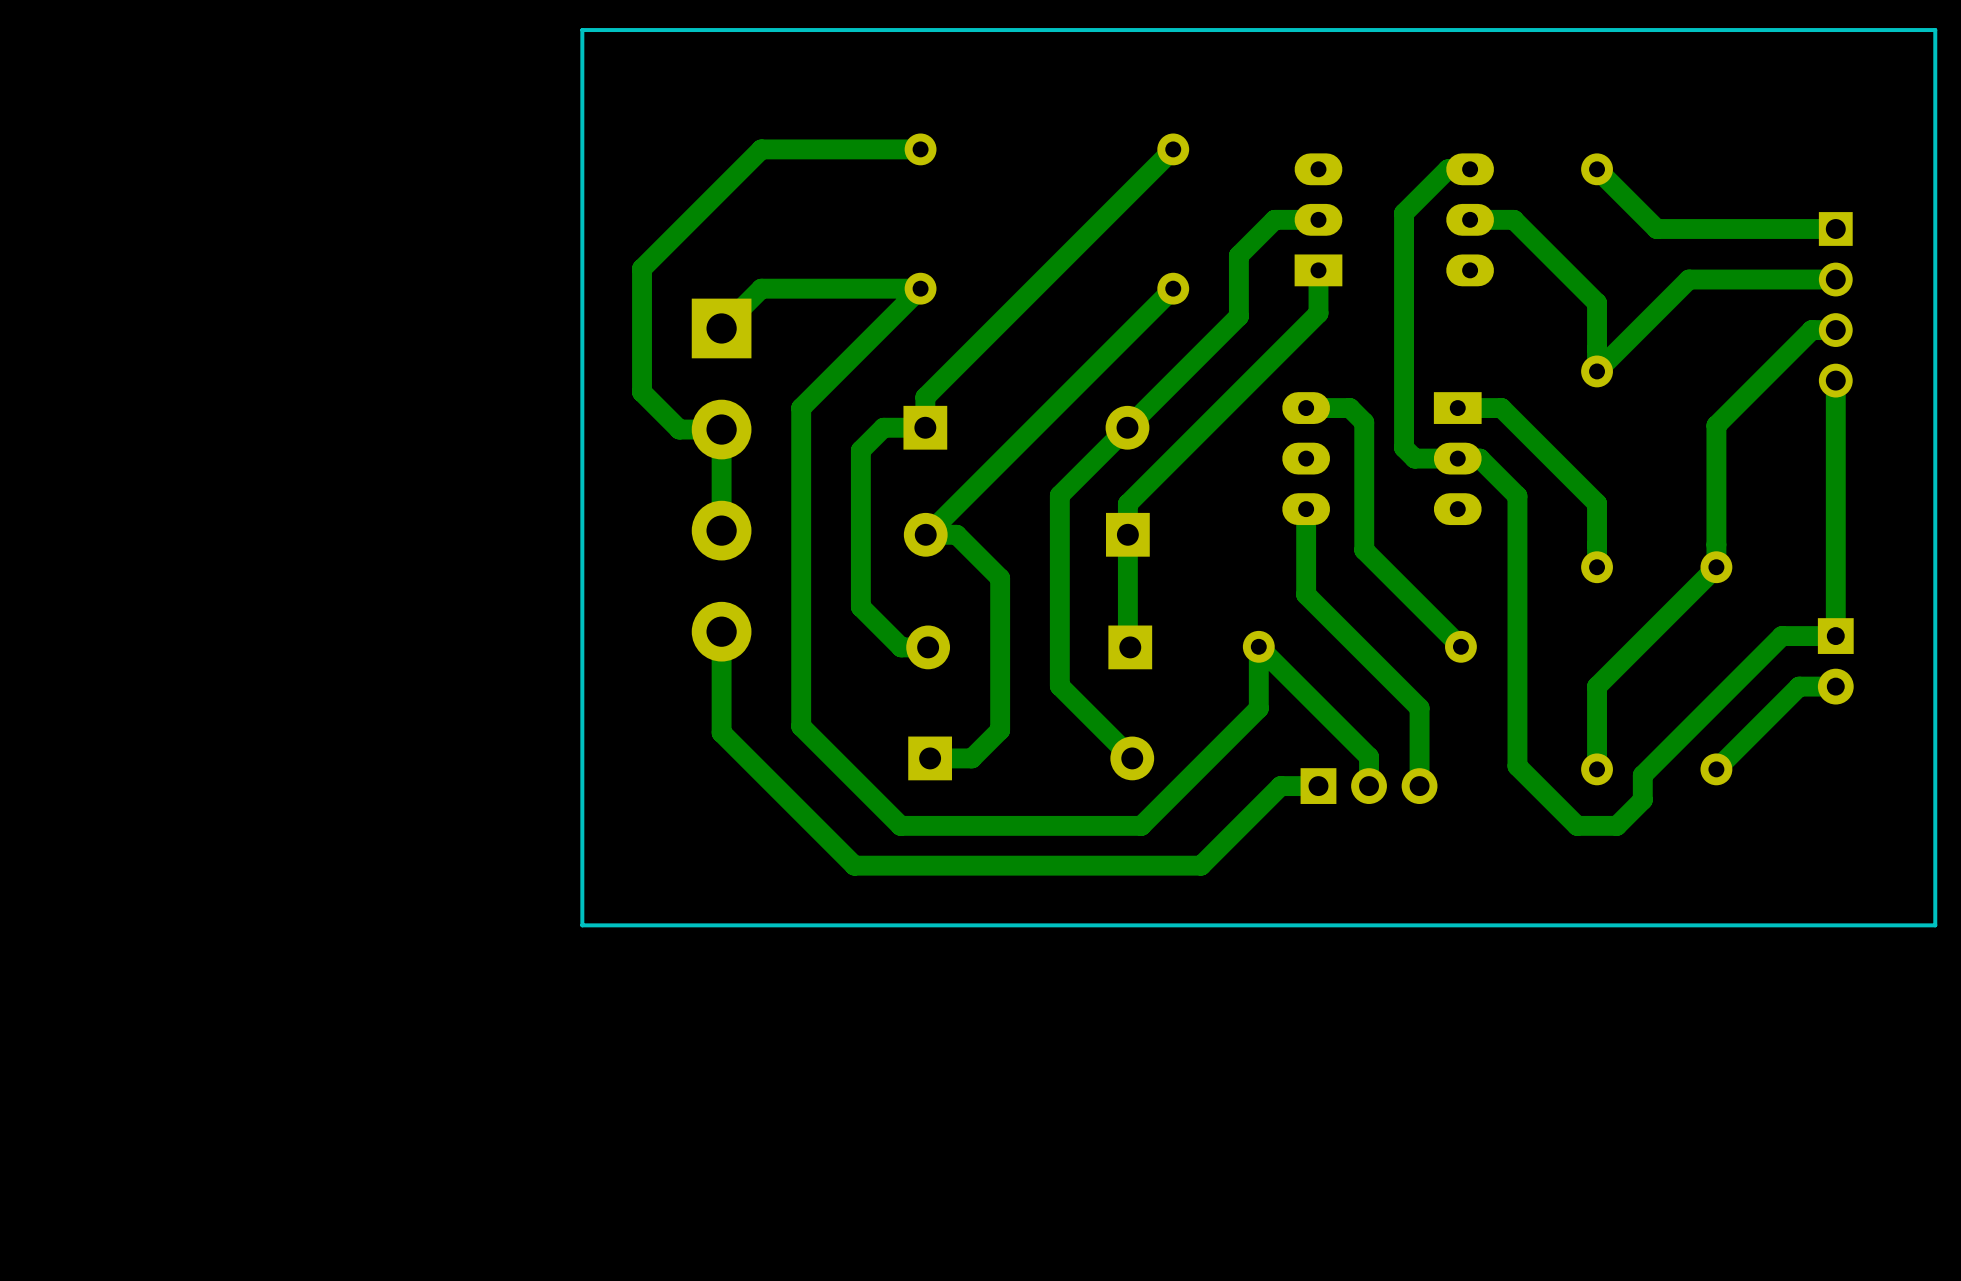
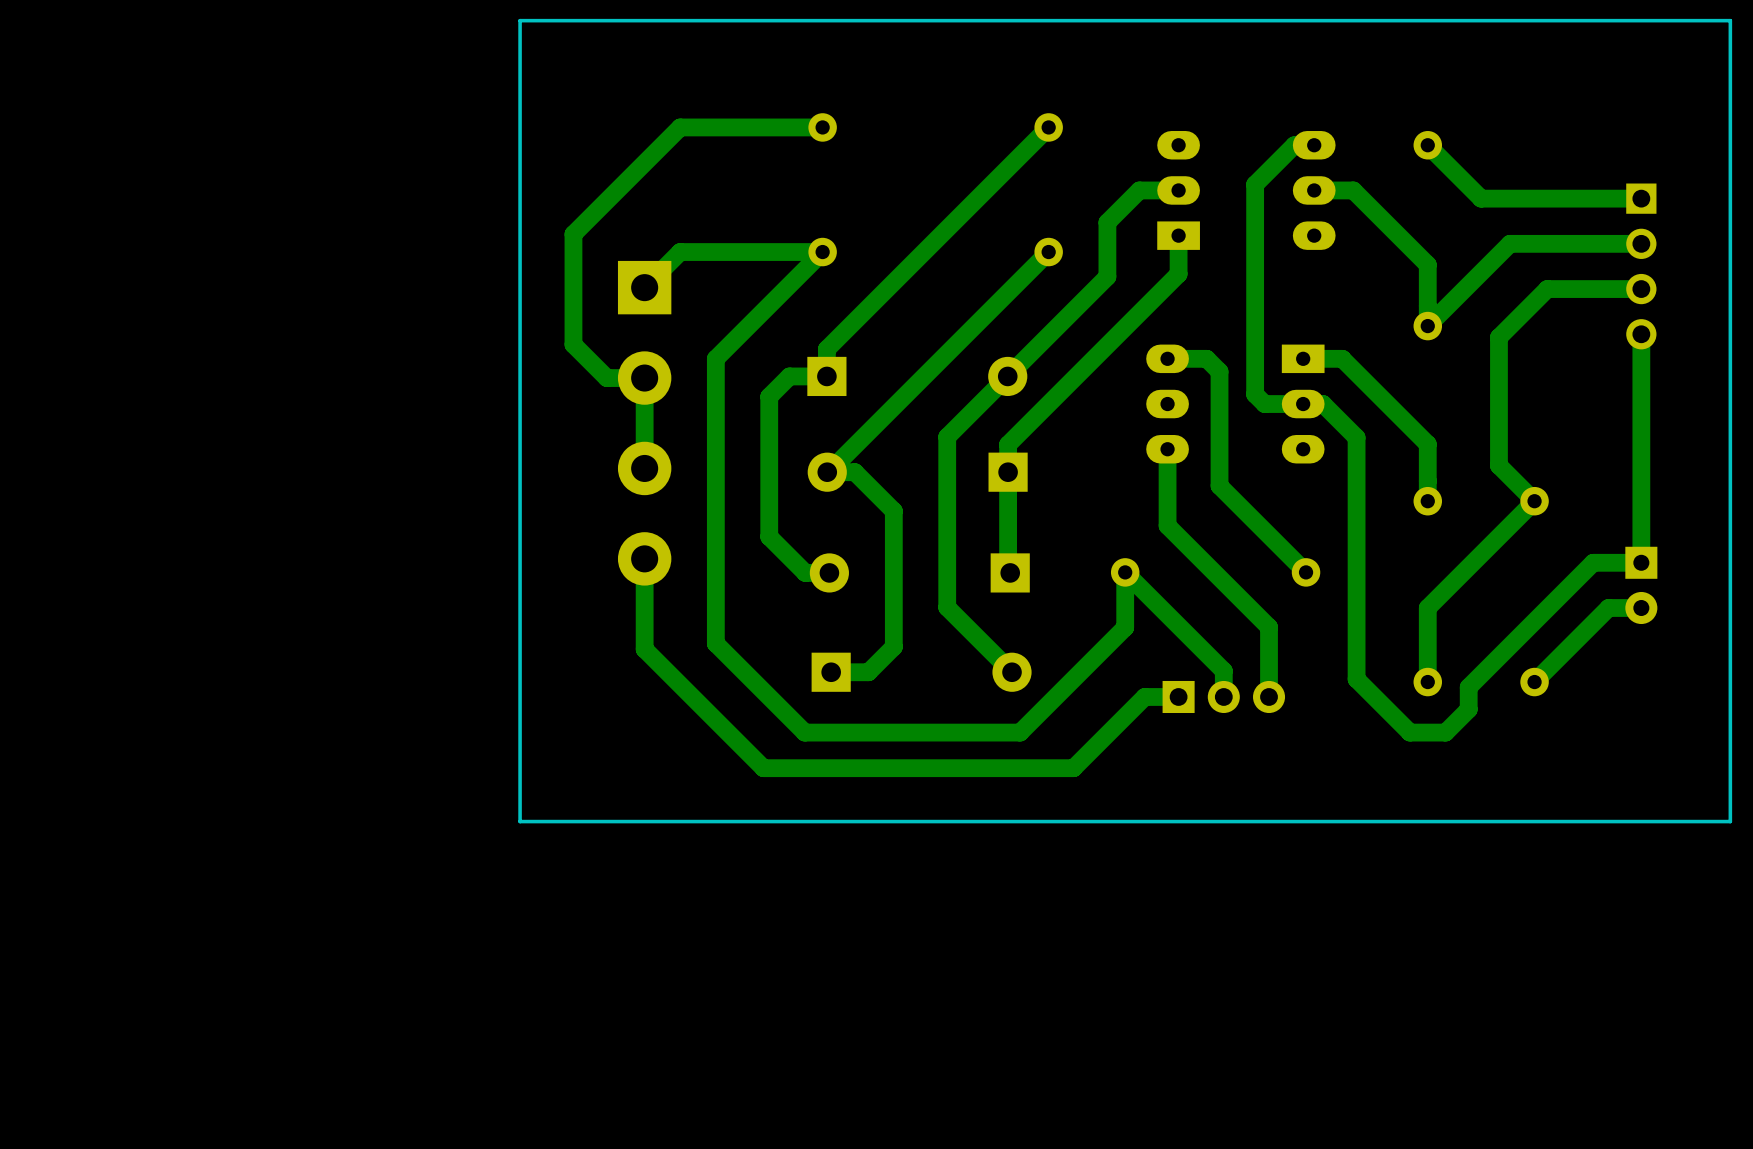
track: (1811, 330) (1716, 425) (1716, 567) -> (1619, 289) (1547, 289) (1498, 337) (1498, 465) (1534, 501)

